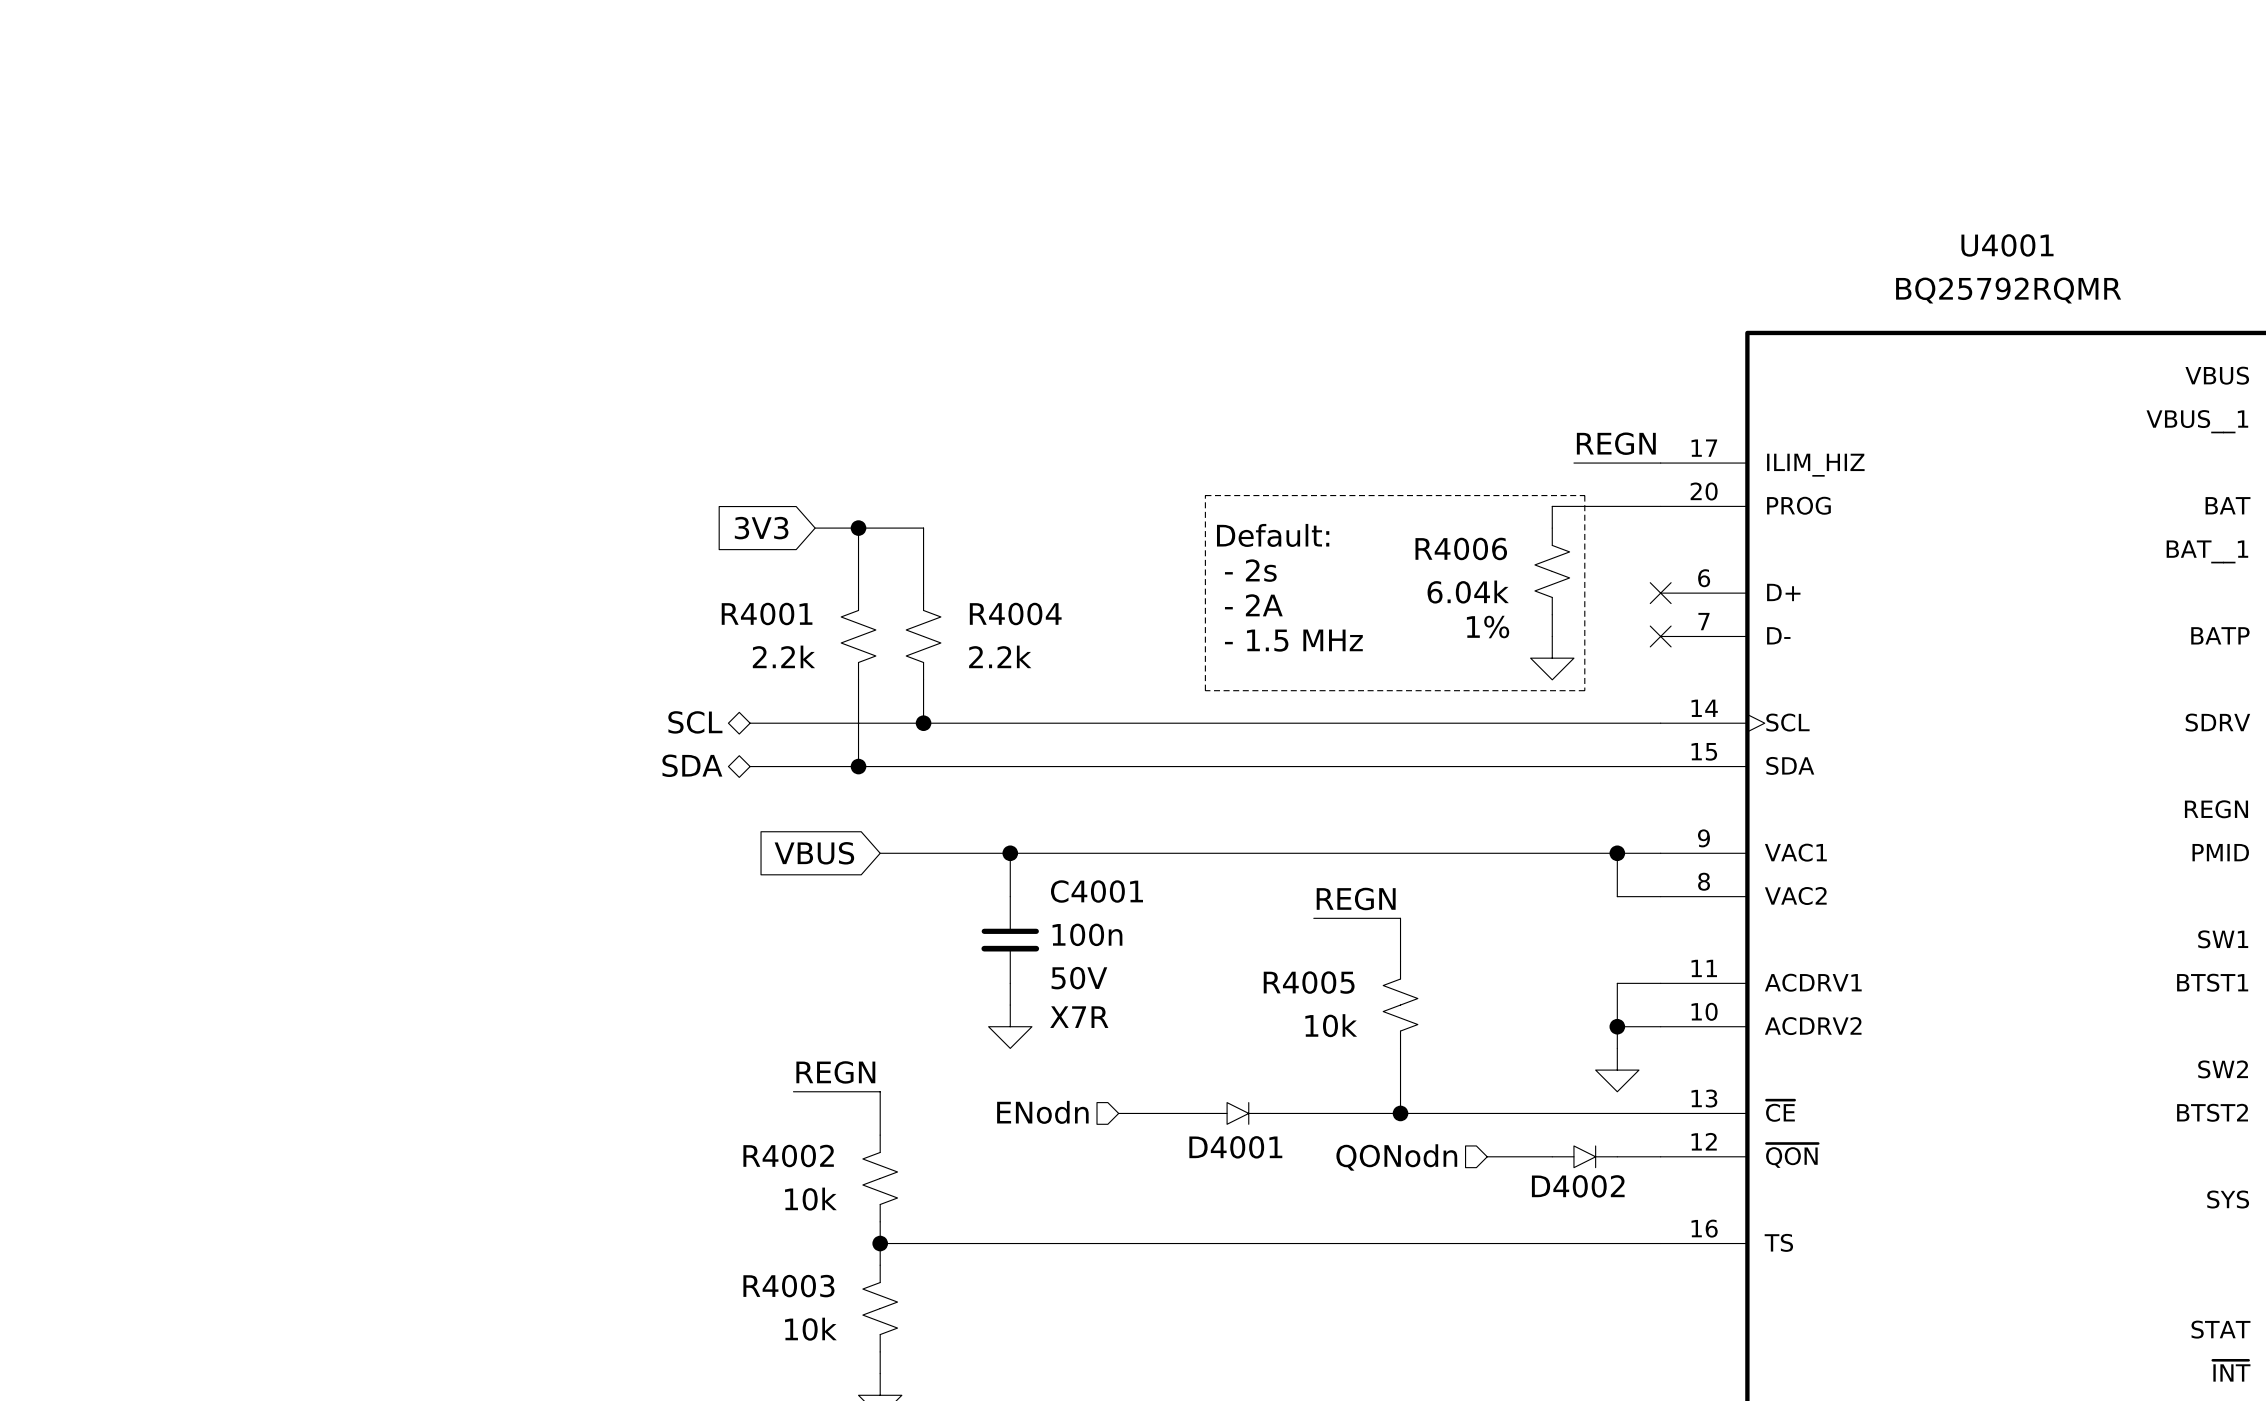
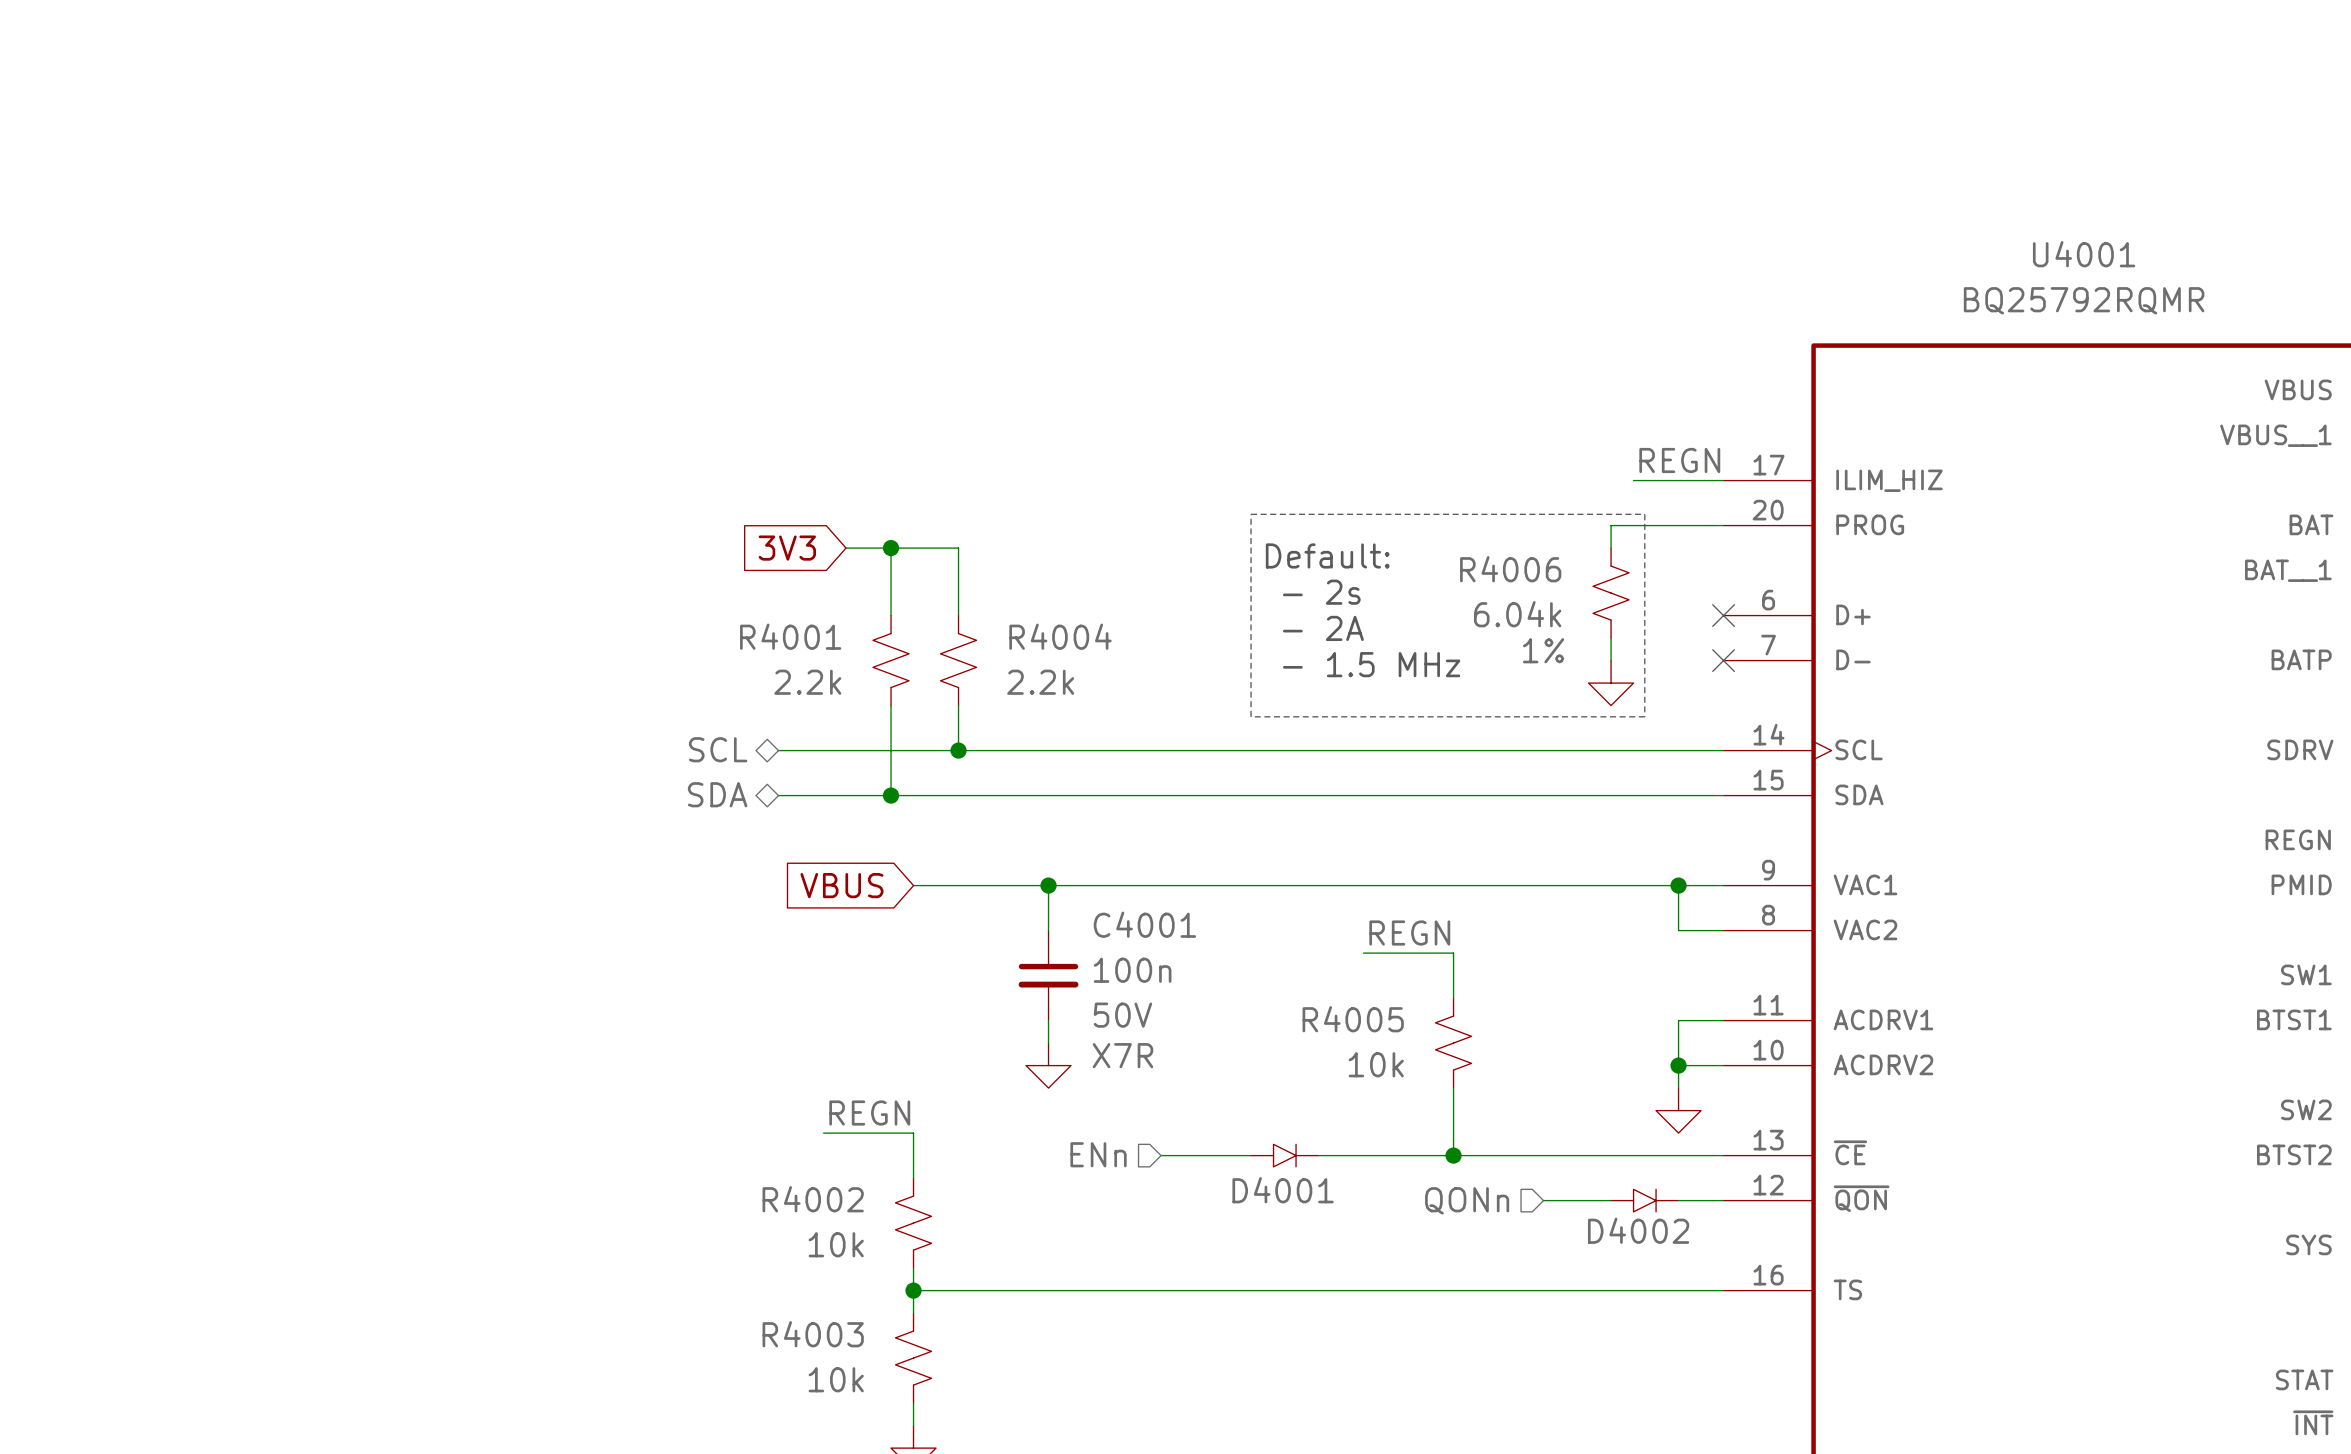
hierarchical label: ENodn (1042, 1112) -> ENn (1098, 1154)
hierarchical label: QONodn (1396, 1157) -> QONn (1467, 1200)

